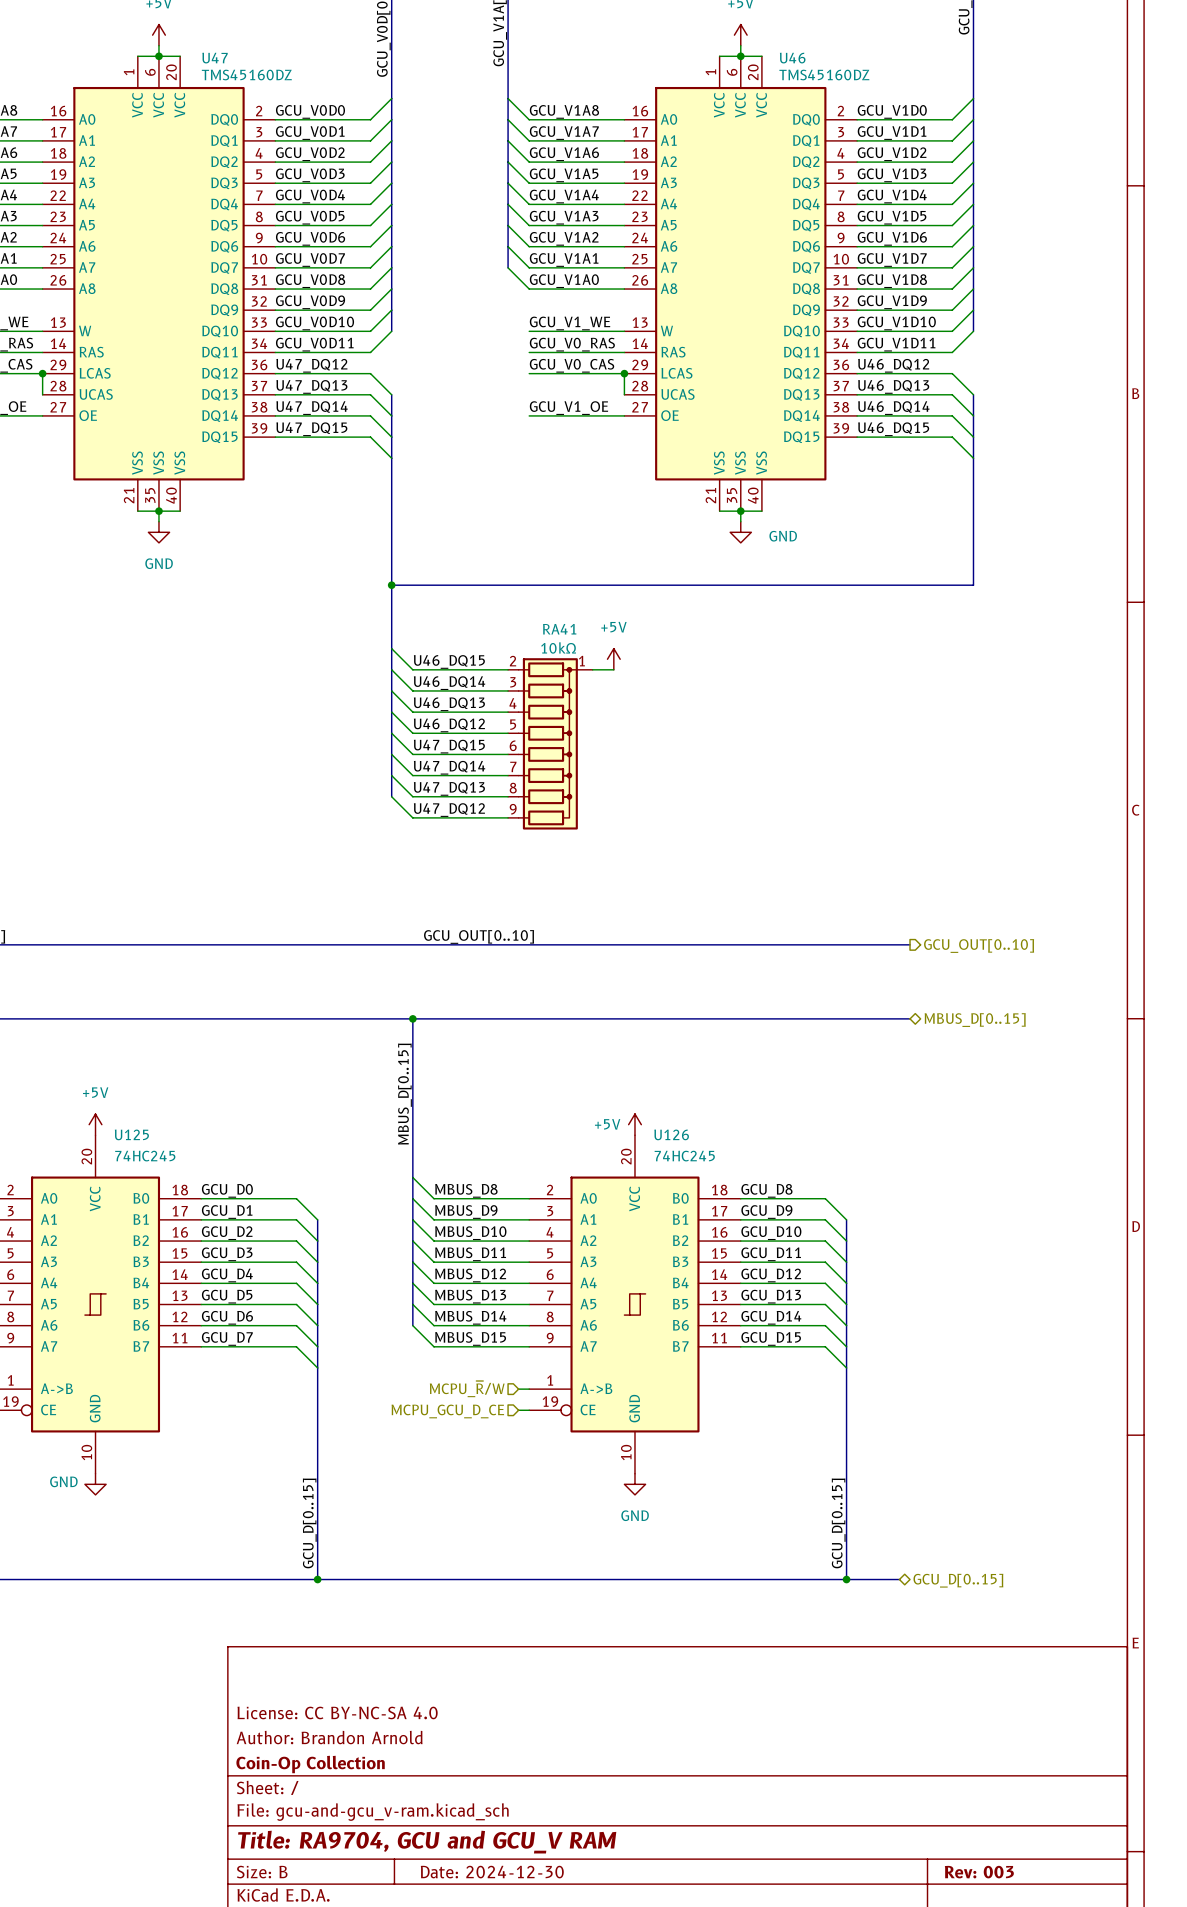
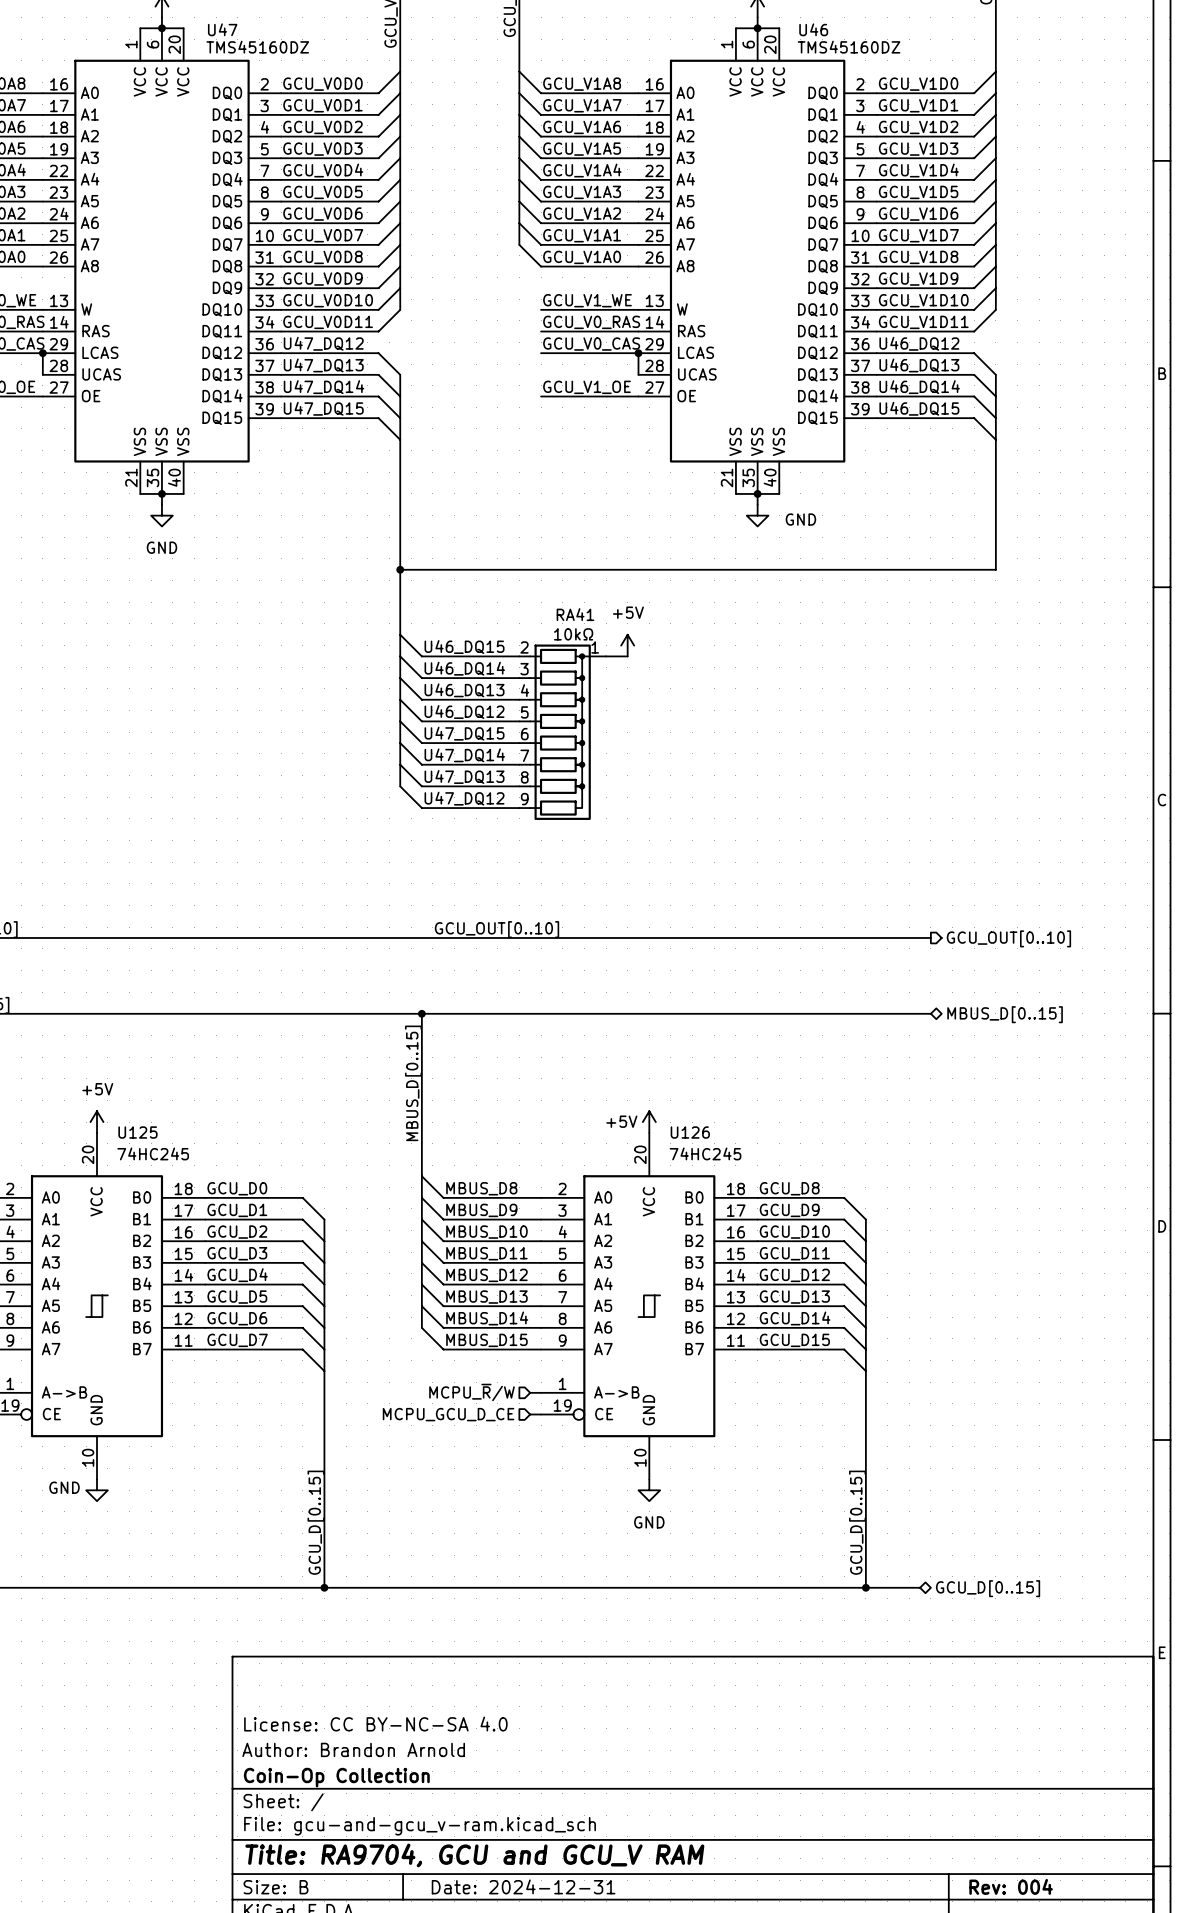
title block: Date: 2024-12-30 (492, 1872) -> Date: 2024-12-31 (523, 1886)
title block: Rev: 003 (979, 1872) -> Rev: 004 (1011, 1886)

